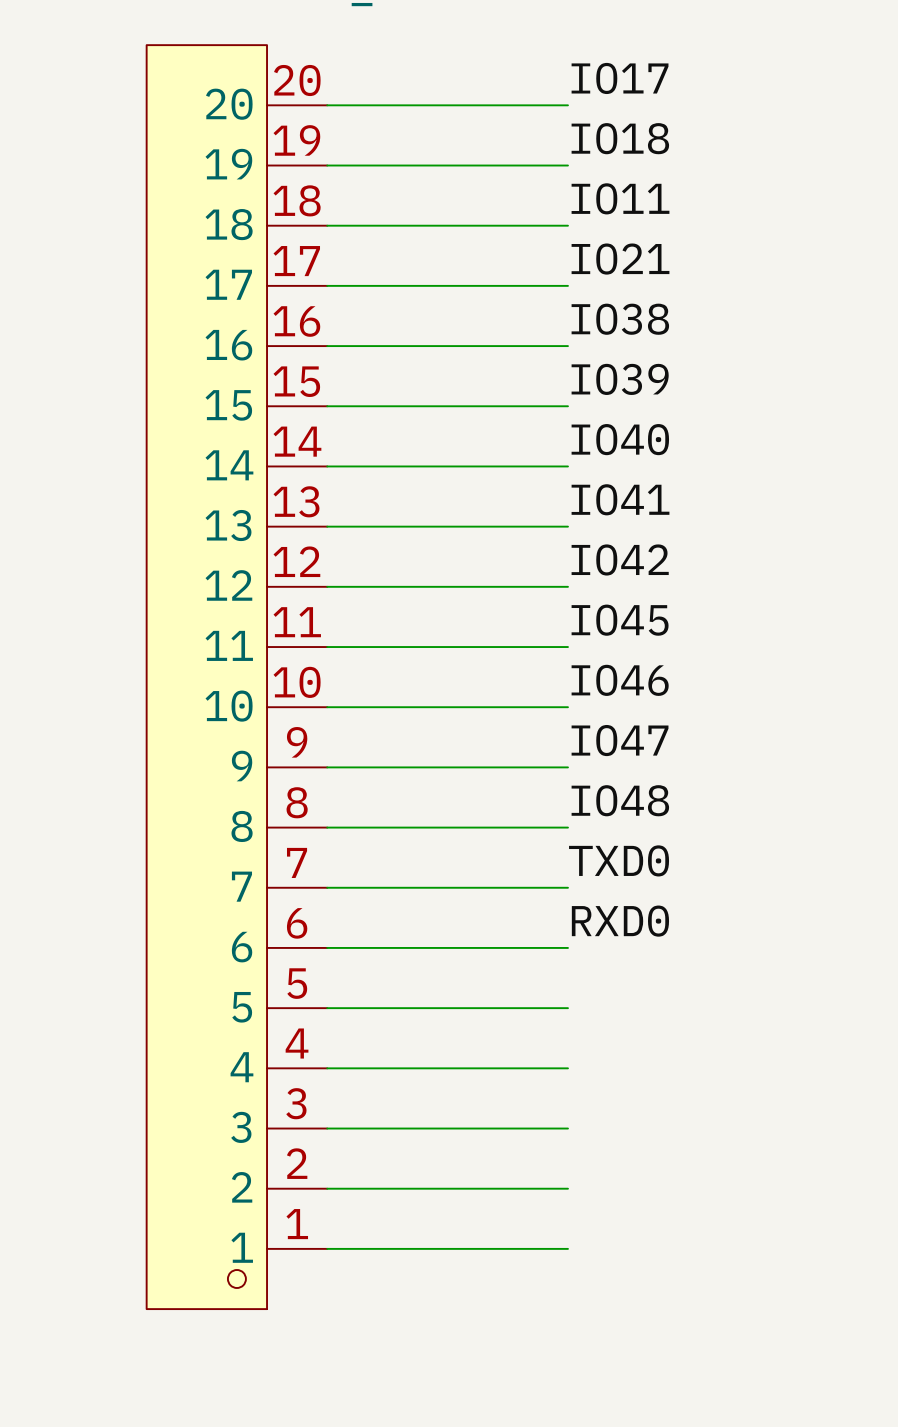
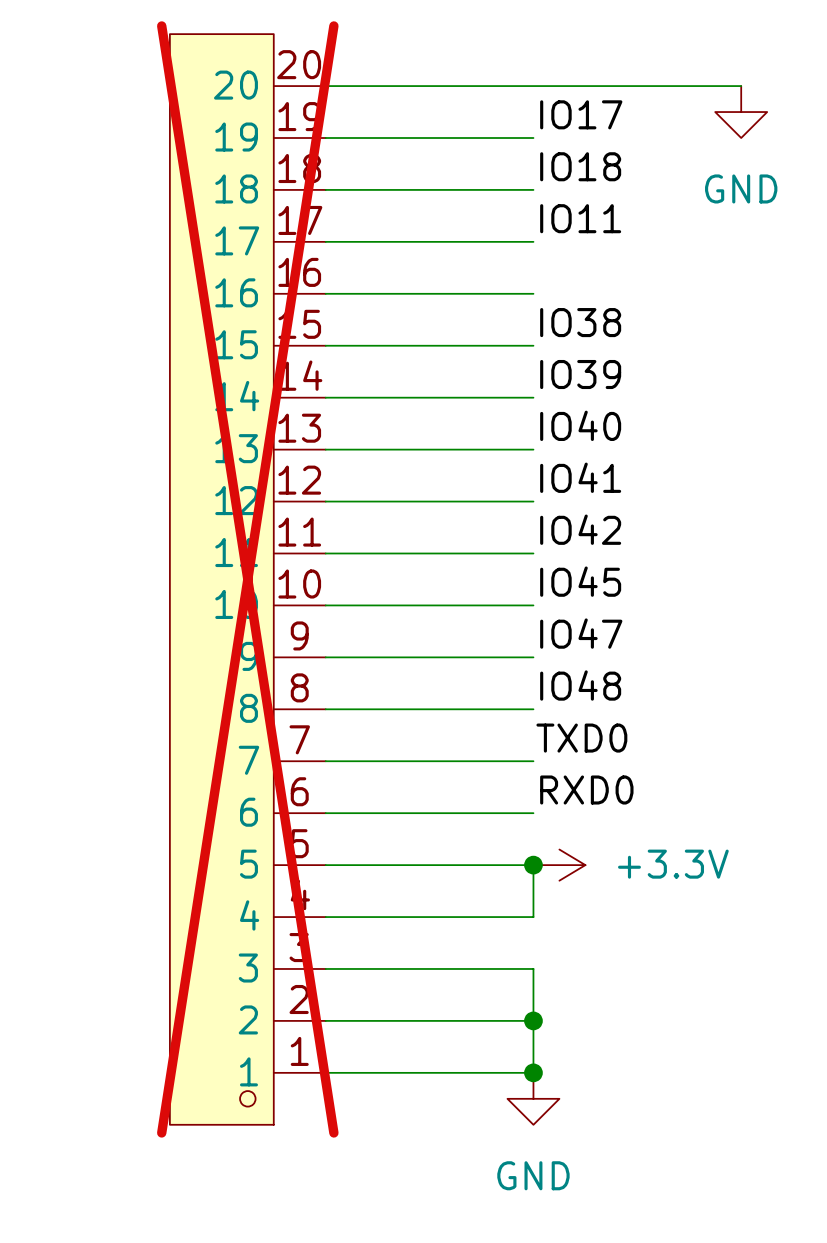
label: IO17 (620, 78) -> none
wire: none -> (533, 86) (741, 86)
power symbol: none -> GND (741, 112)
label: IO18 (620, 138) -> IO17 (581, 114)
label: IO11 (620, 198) -> IO18 (580, 166)
label: IO21 (620, 259) -> IO11 (580, 218)
label: IO38 (620, 319) -> none
label: IO39 (620, 379) -> IO38 (580, 322)
label: IO40 (620, 439) -> IO39 (580, 374)
label: IO41 (620, 499) -> IO40 (580, 425)
label: IO42 (620, 559) -> IO41 (580, 477)
label: IO45 (620, 620) -> IO42 (580, 529)
part do-not-place cross: none -> (247, 579)
label: IO46 (620, 680) -> IO45 (580, 581)
wire: none -> (533, 865) (533, 917)
junction: none -> (533, 865)
power symbol: none -> +3.3V (559, 865)
wire: none -> (533, 968) (533, 1072)
junction: none -> (533, 1020)
junction: none -> (533, 1072)
power symbol: none -> GND (533, 1098)

